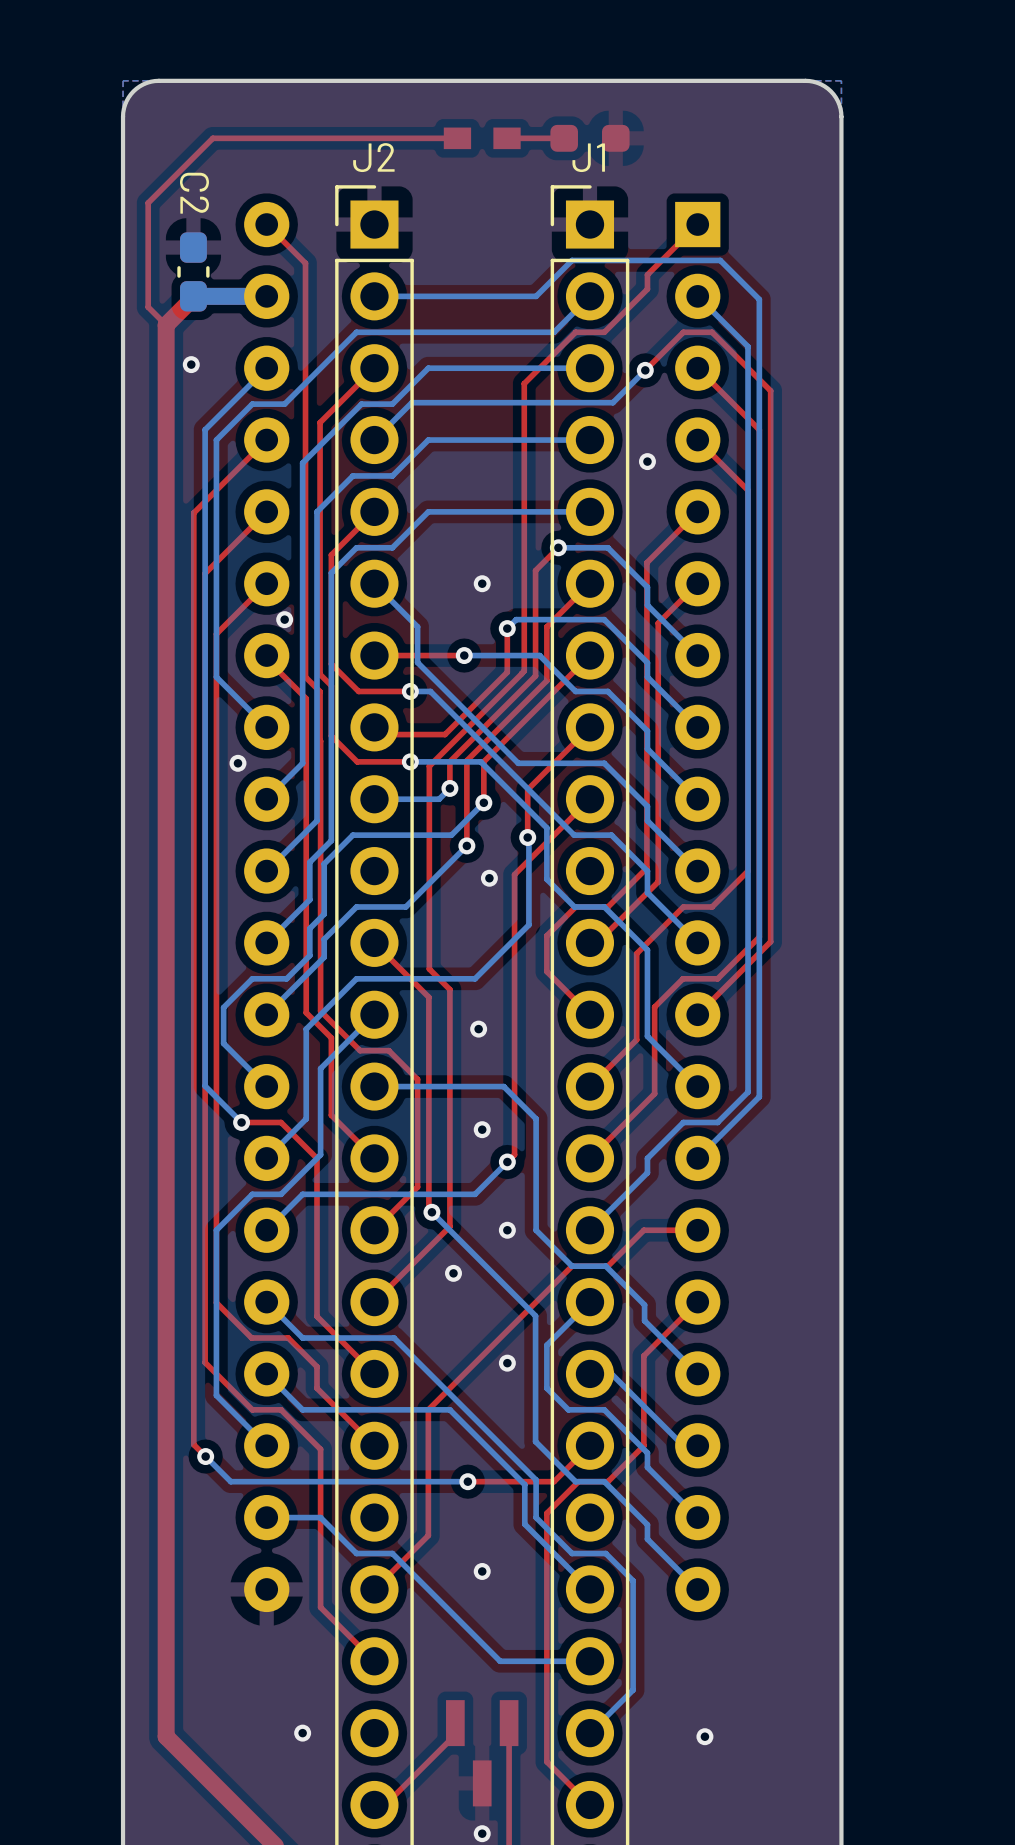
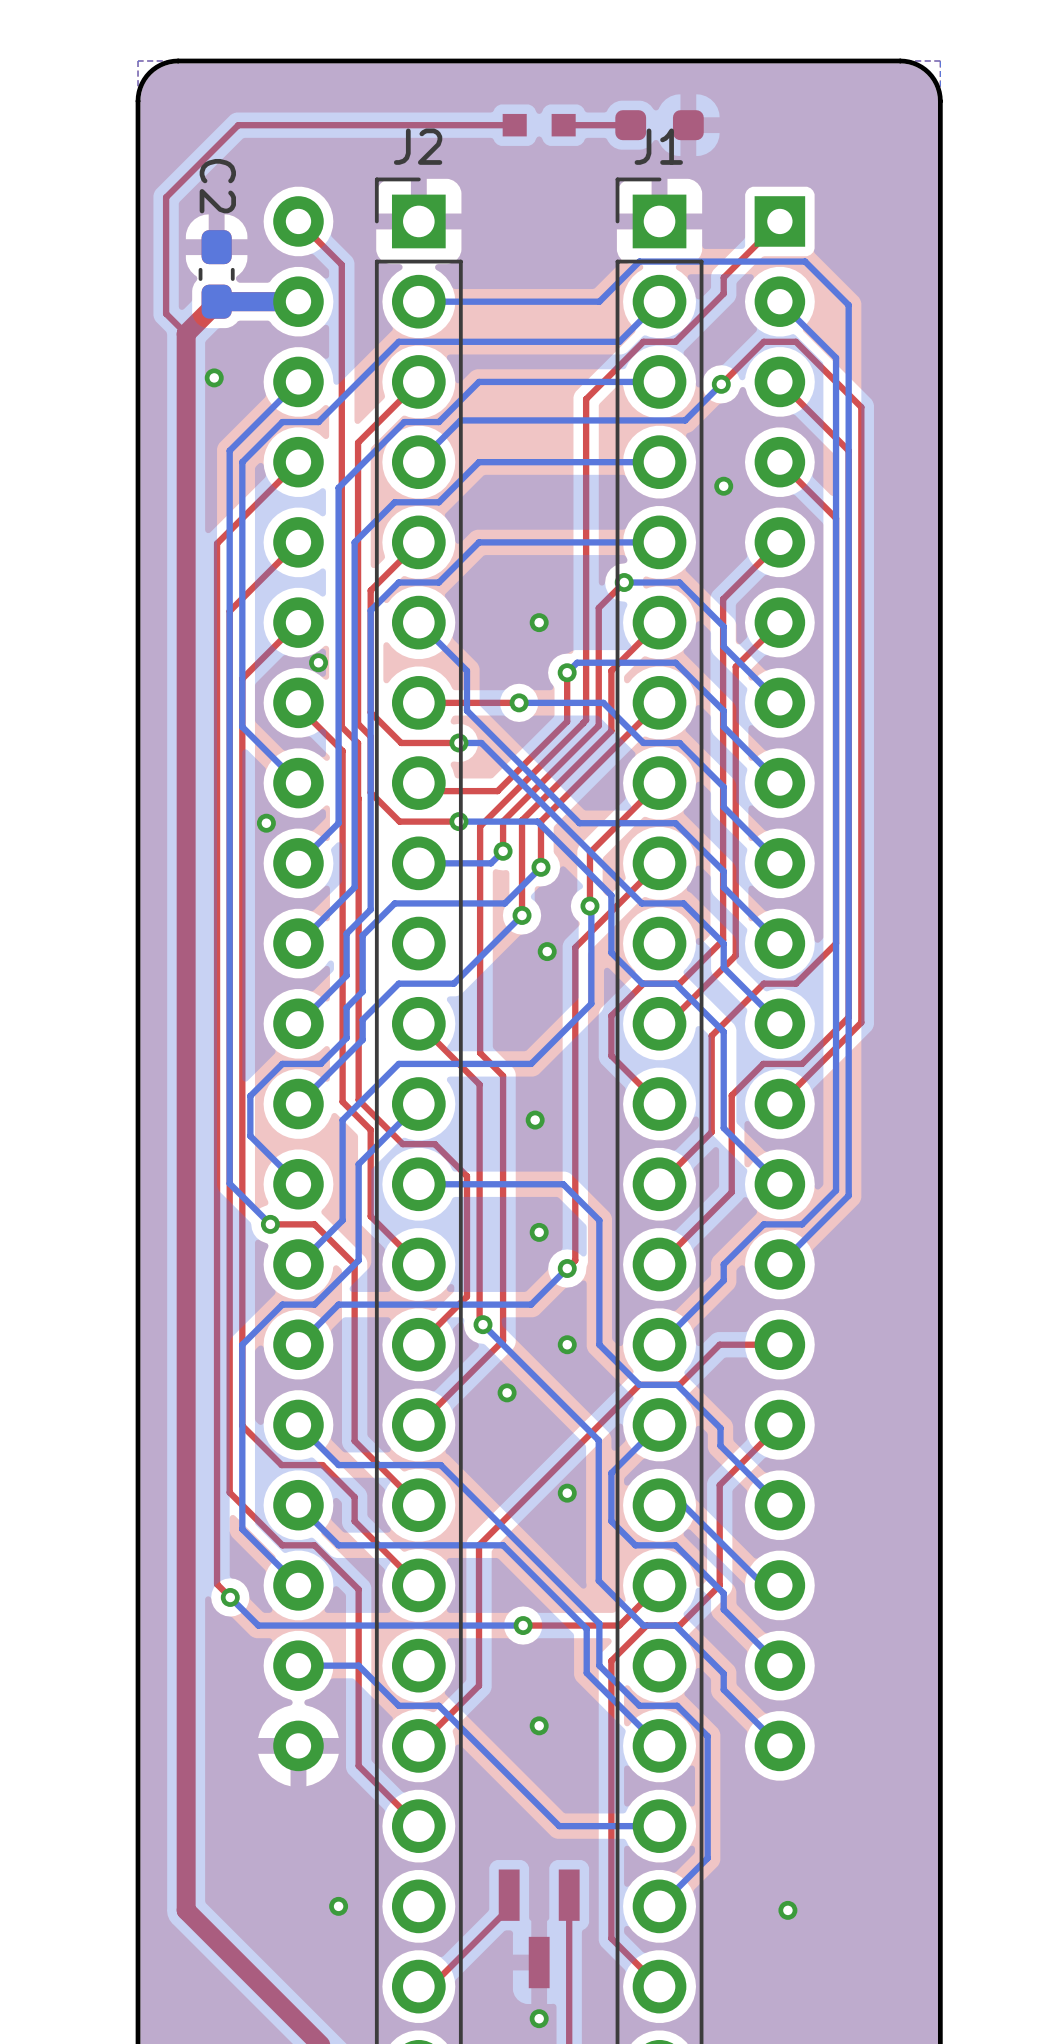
part footprint: [443, 127, 521, 150] -> [502, 113, 576, 137]

